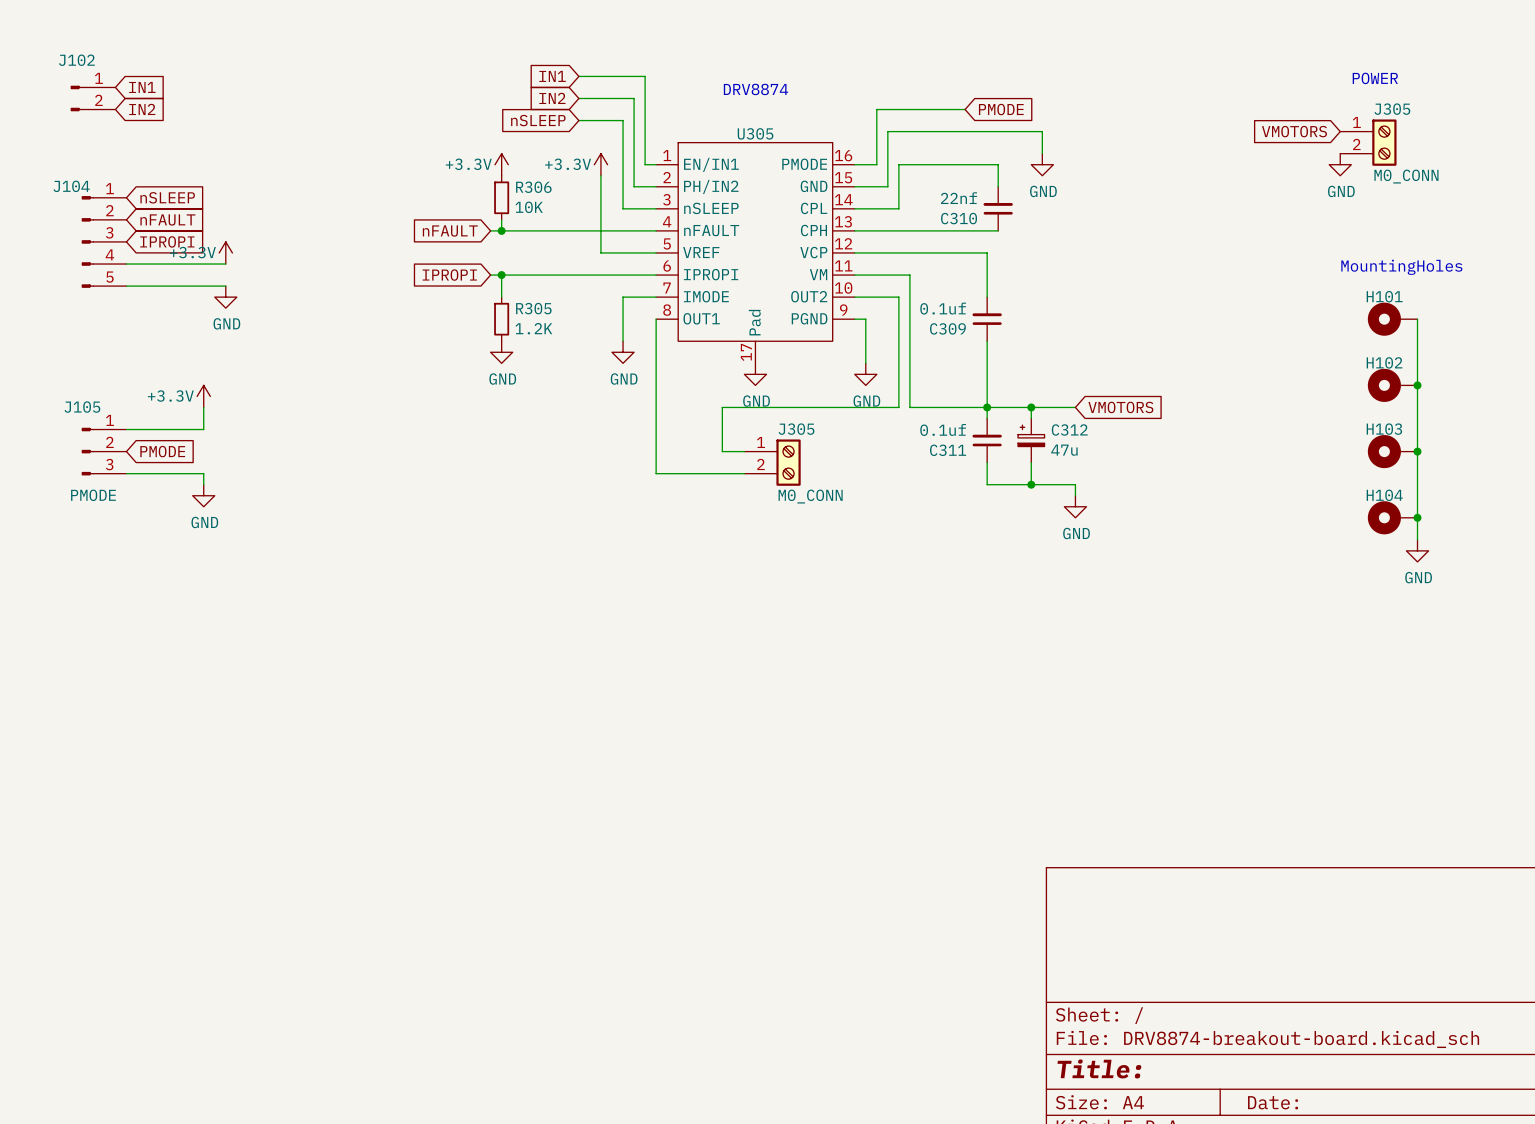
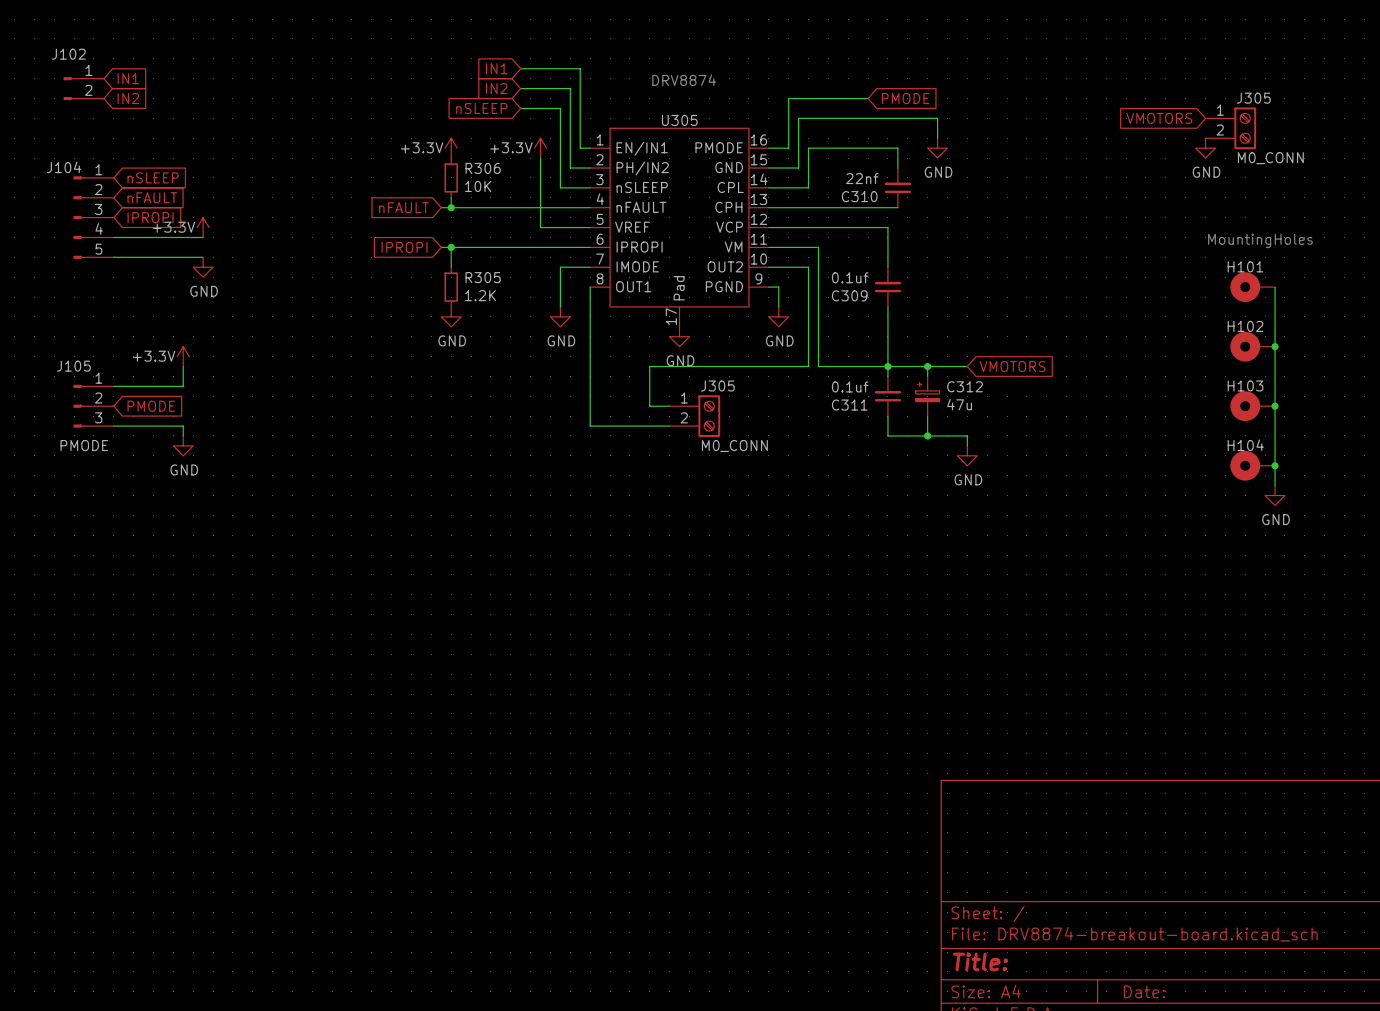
text: POWER (1375, 78) -> none
power symbol position: GND (865, 374) -> GND (778, 316)

